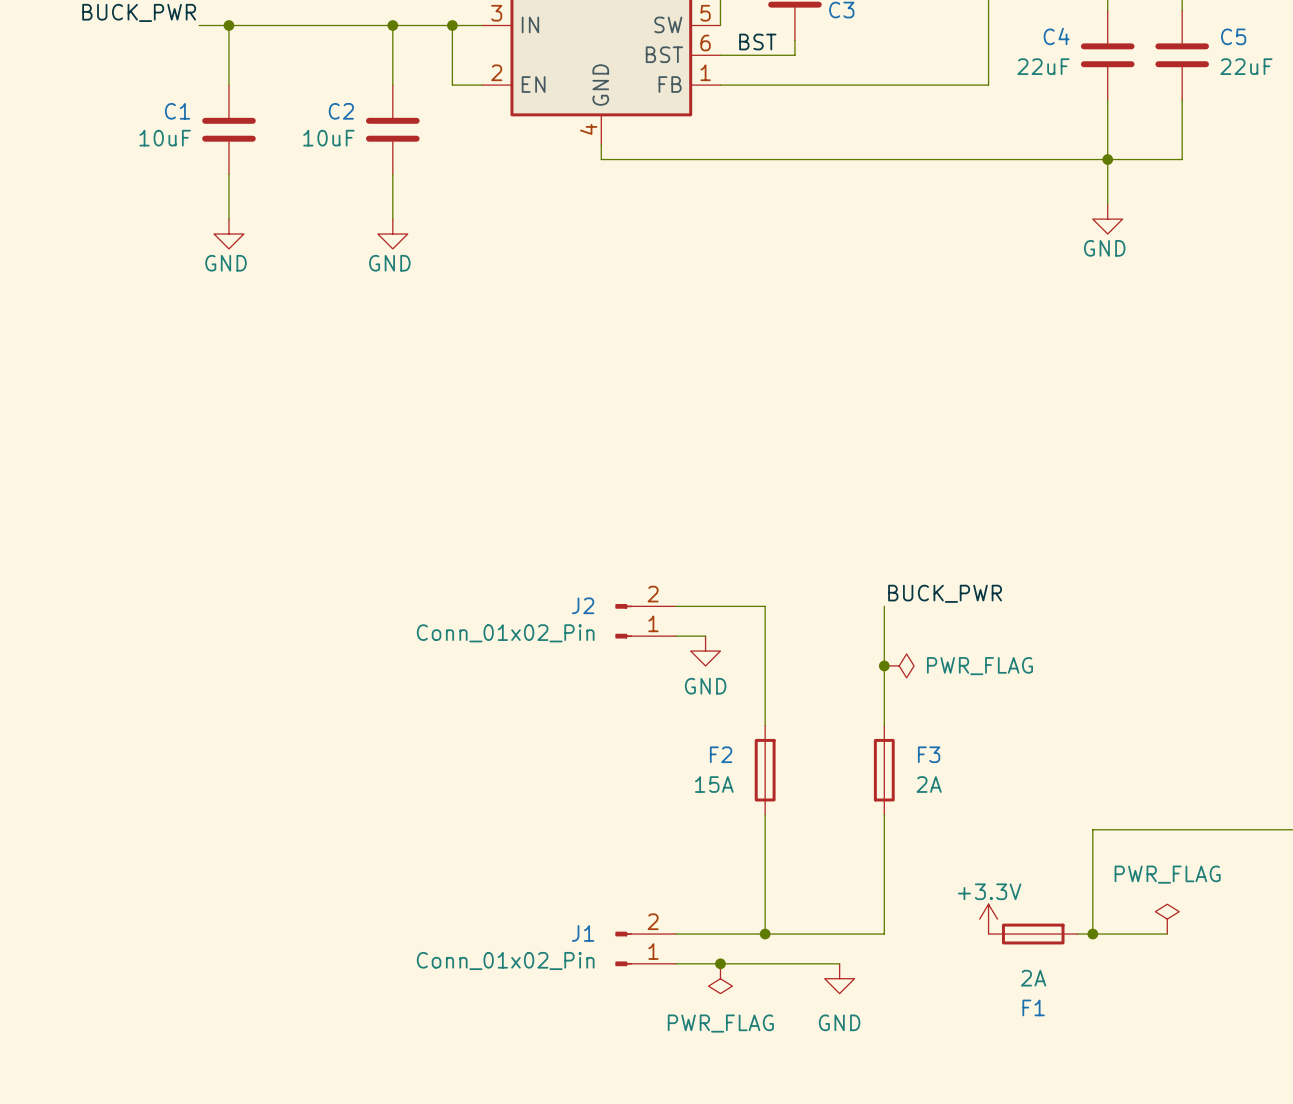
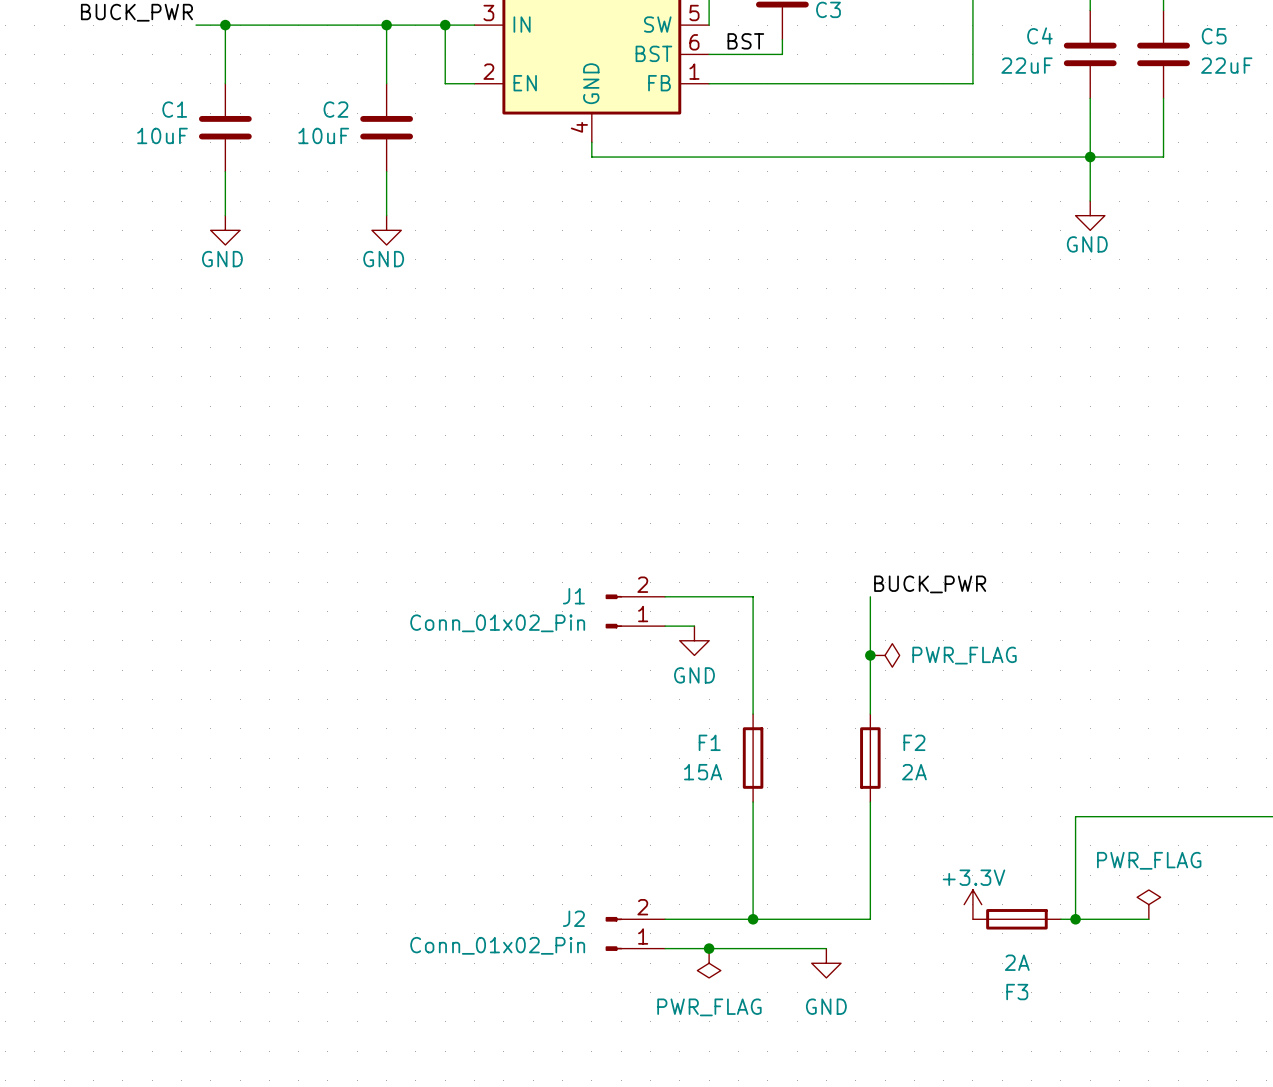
J2 name: J2 (583, 605) -> J1 (573, 596)
F2 name: F2 (721, 754) -> F1 (709, 742)
F3 name: F3 (929, 754) -> F2 (914, 742)
J1 name: J1 (583, 933) -> J2 (573, 918)
F1 name: F1 (1033, 1007) -> F3 (1017, 992)

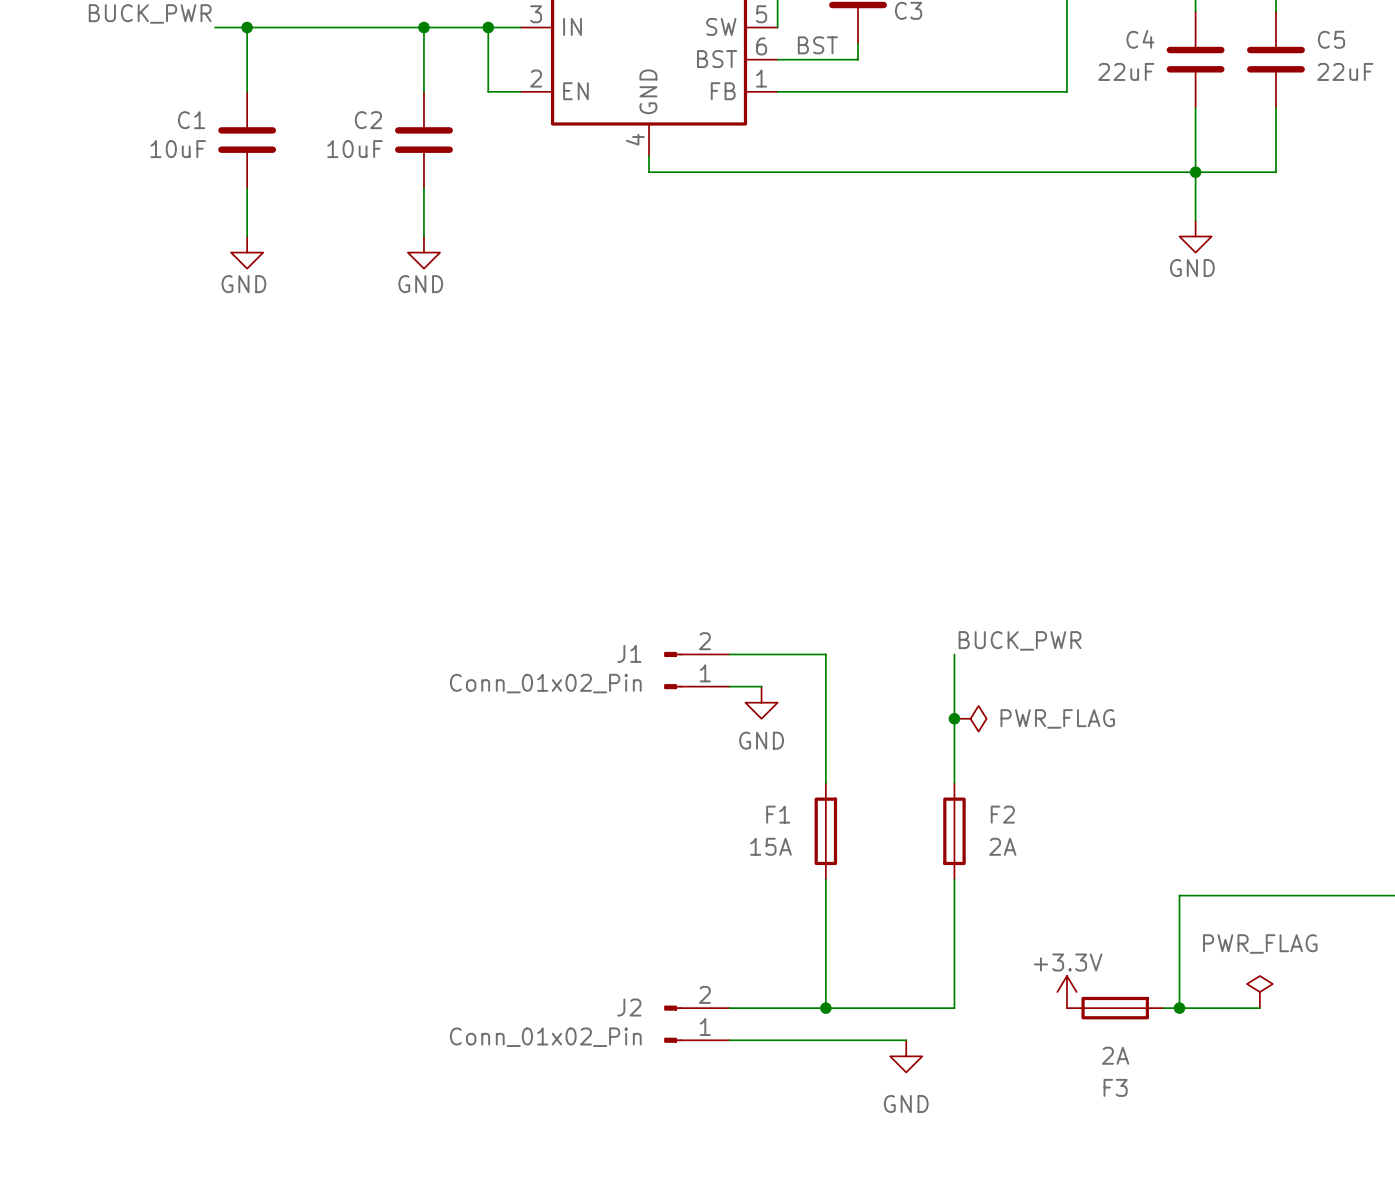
junction: (709, 948) -> none
power symbol: PWR_FLAG (709, 963) -> none

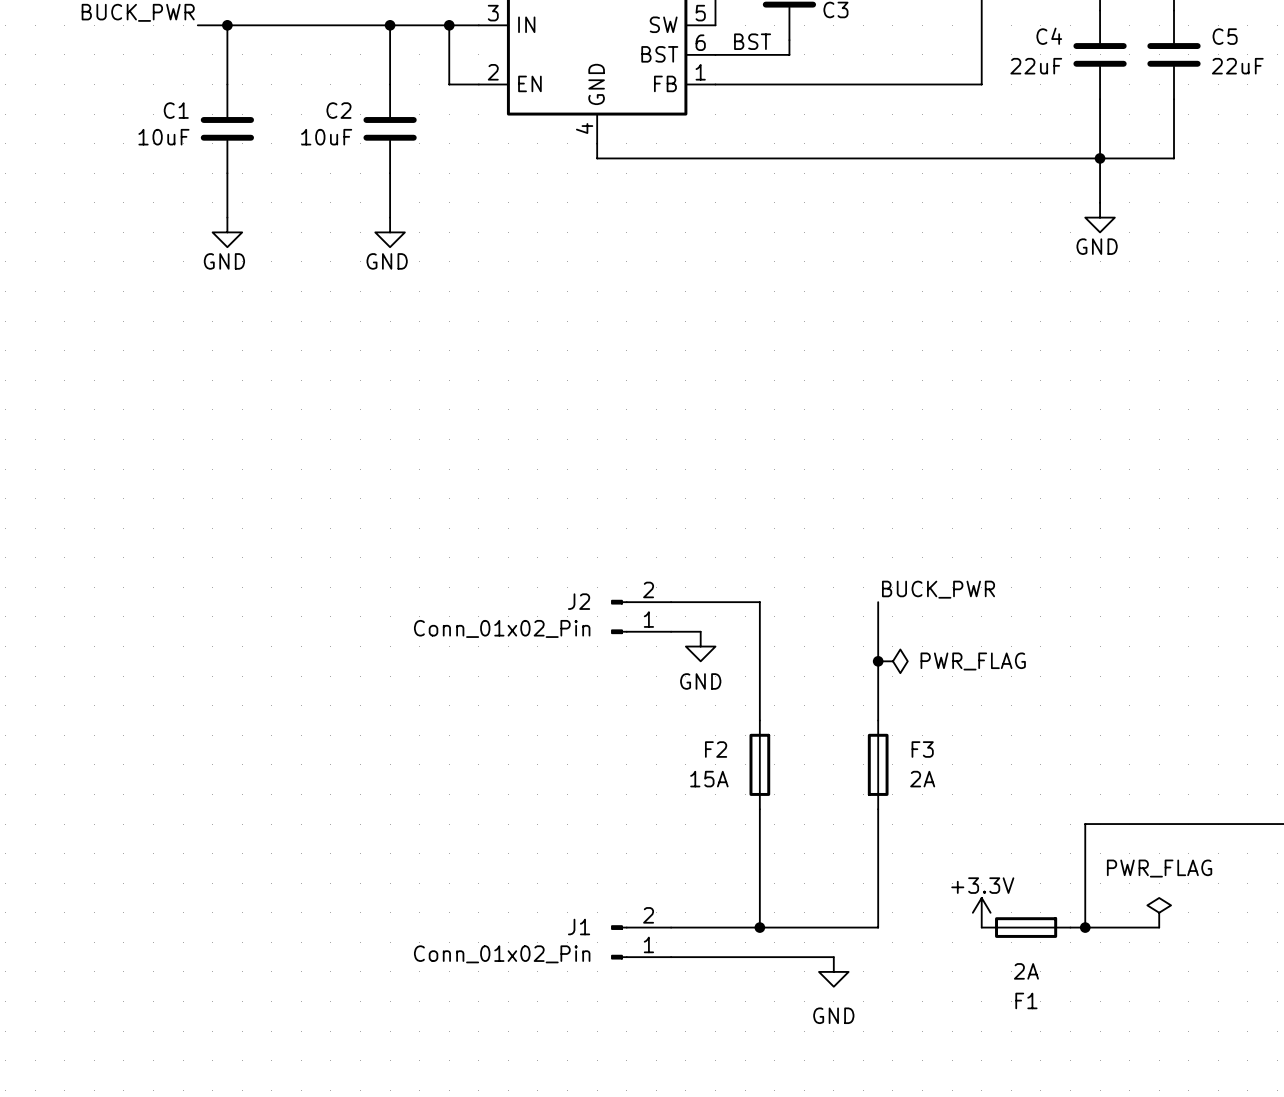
J1 name: J1 (629, 653) -> J2 (579, 601)
F1 name: F1 (778, 814) -> F2 (716, 749)
F2 name: F2 (1002, 814) -> F3 (922, 749)
J2 name: J2 (629, 1007) -> J1 (579, 927)
F3 name: F3 (1115, 1087) -> F1 (1026, 1000)

